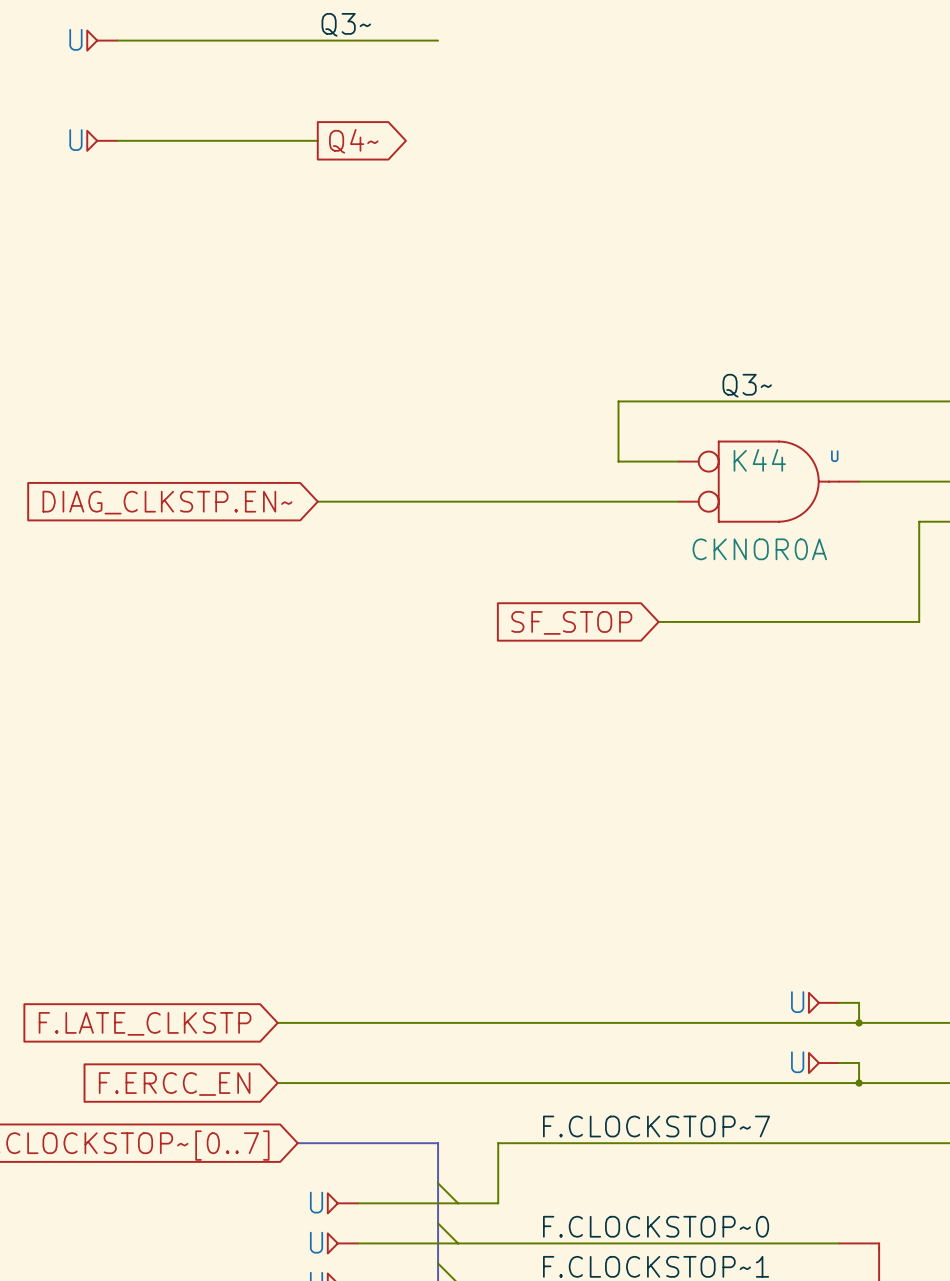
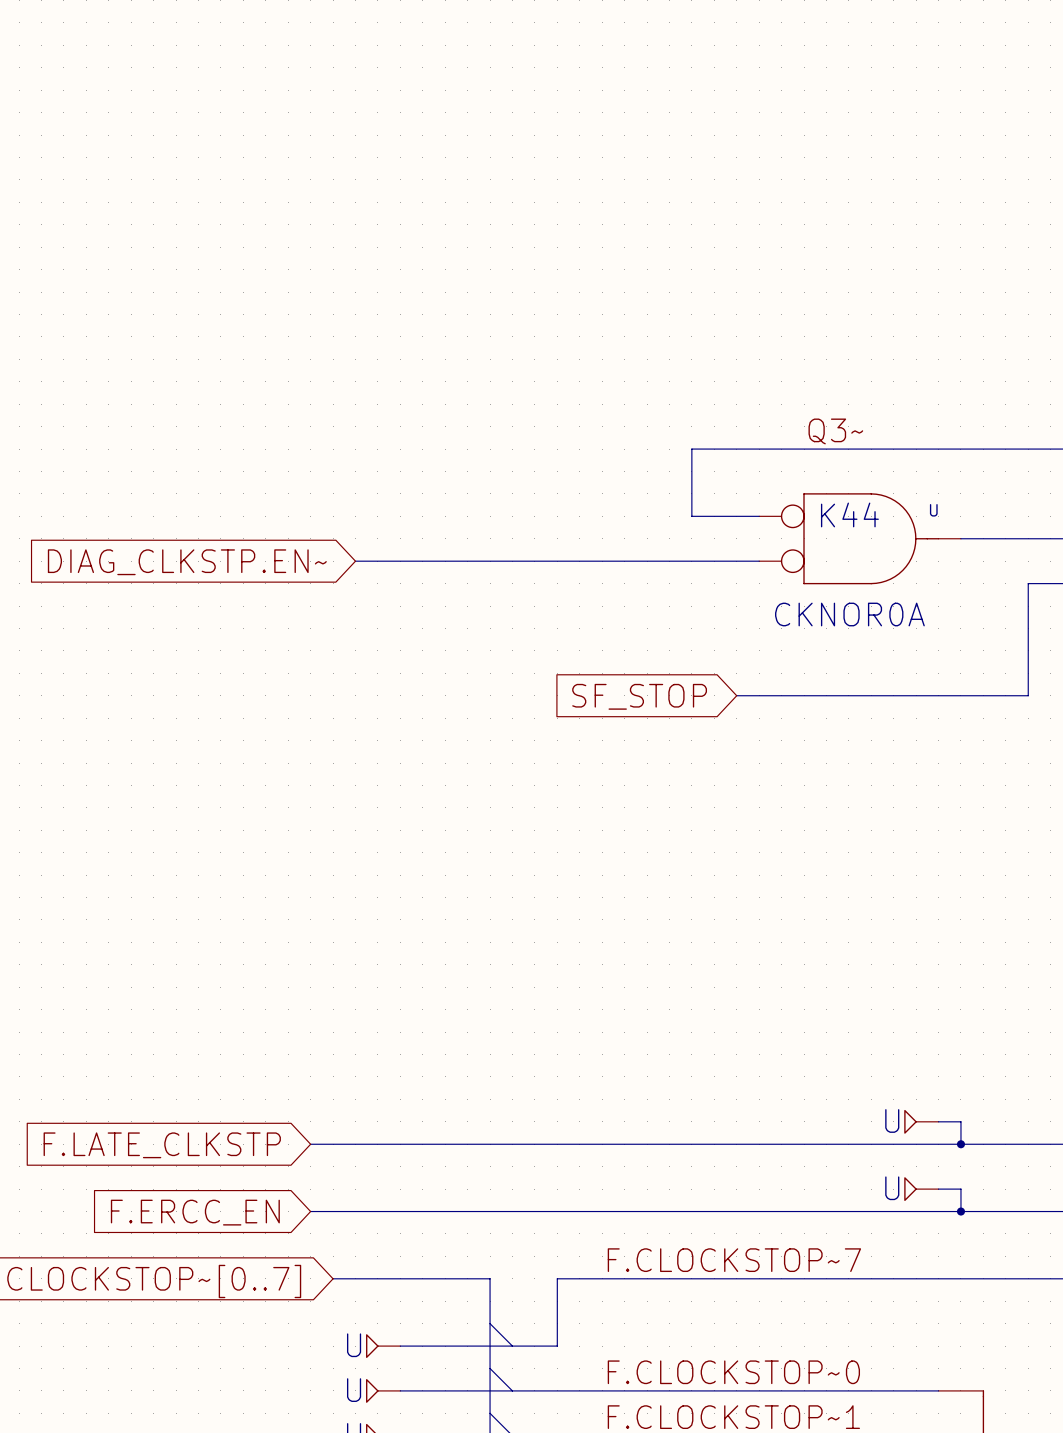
label: Q3~ (346, 24) -> none
U: (101, 40) -> none
wire: (117, 40) (438, 40) -> none
U: (101, 140) -> none
wire: (117, 140) (317, 140) -> none
global label: Q4~ (353, 141) -> none

